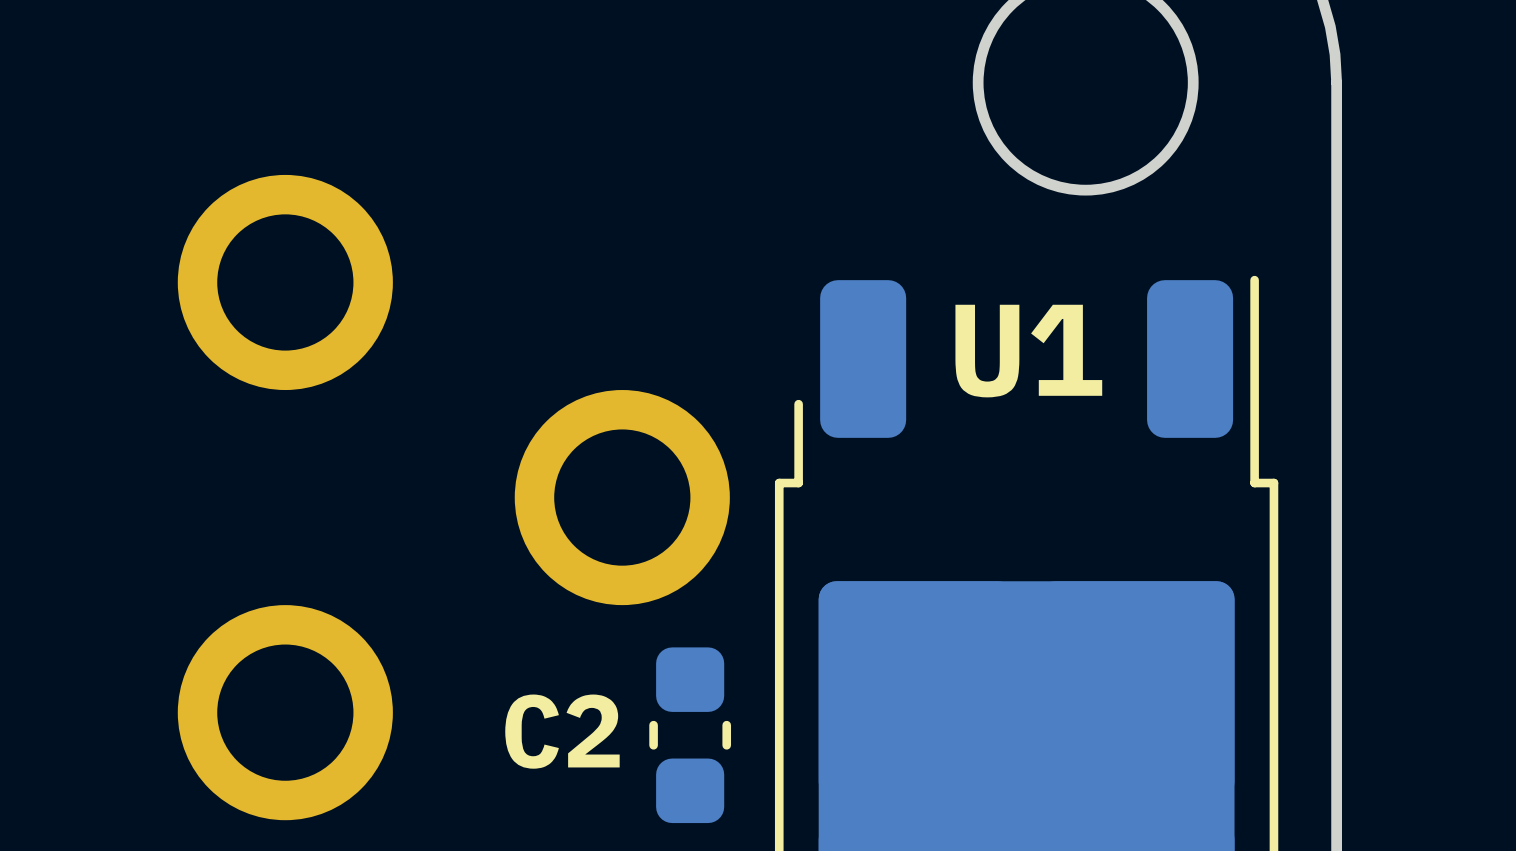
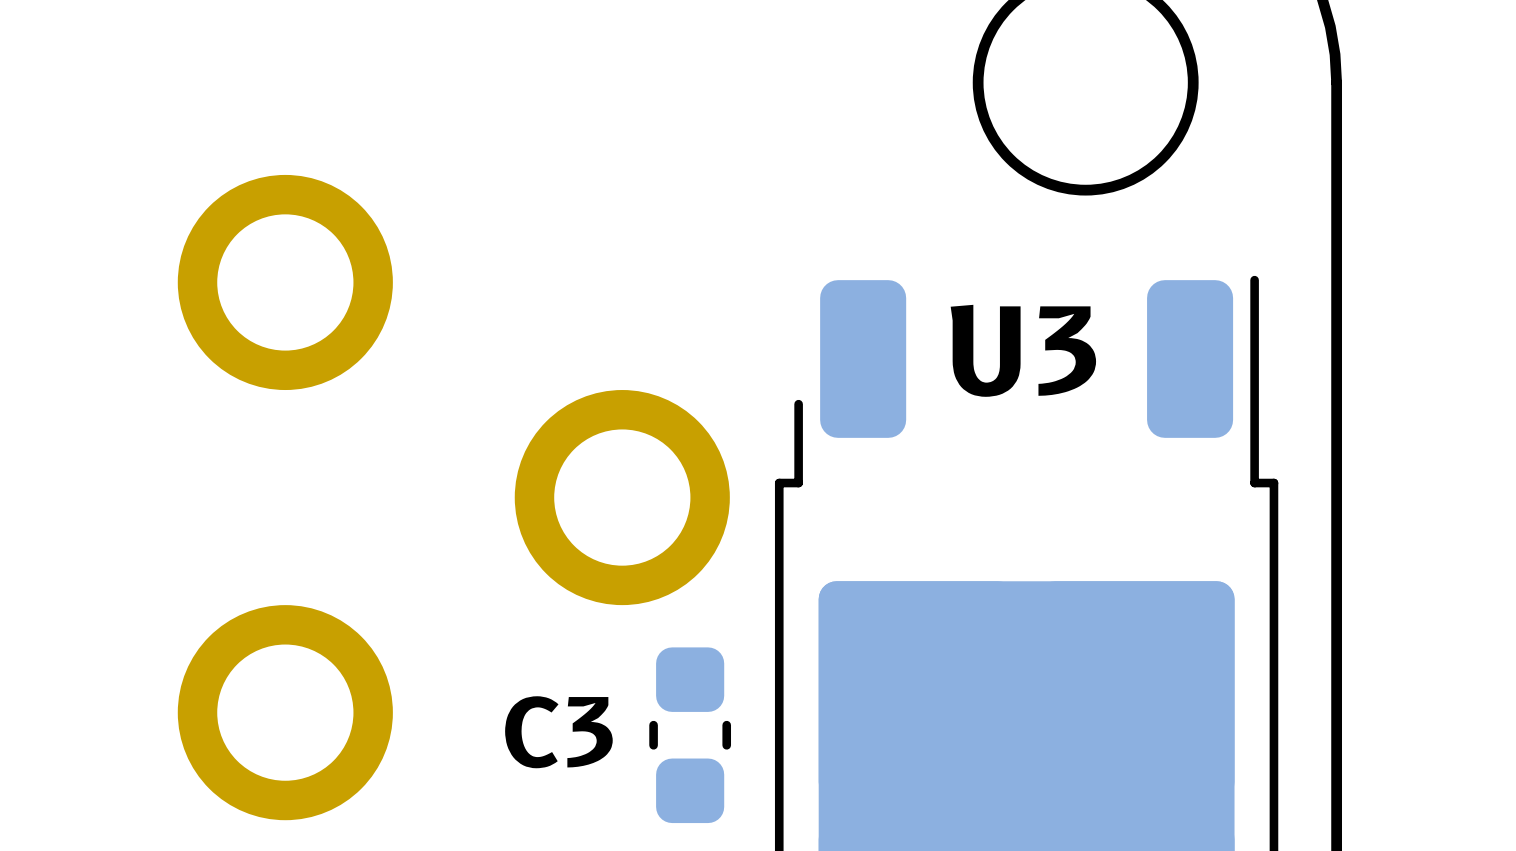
U1 name: U1 (1028, 351) -> U3 (1023, 350)
C2 name: C2 (562, 731) -> C3 (558, 732)

